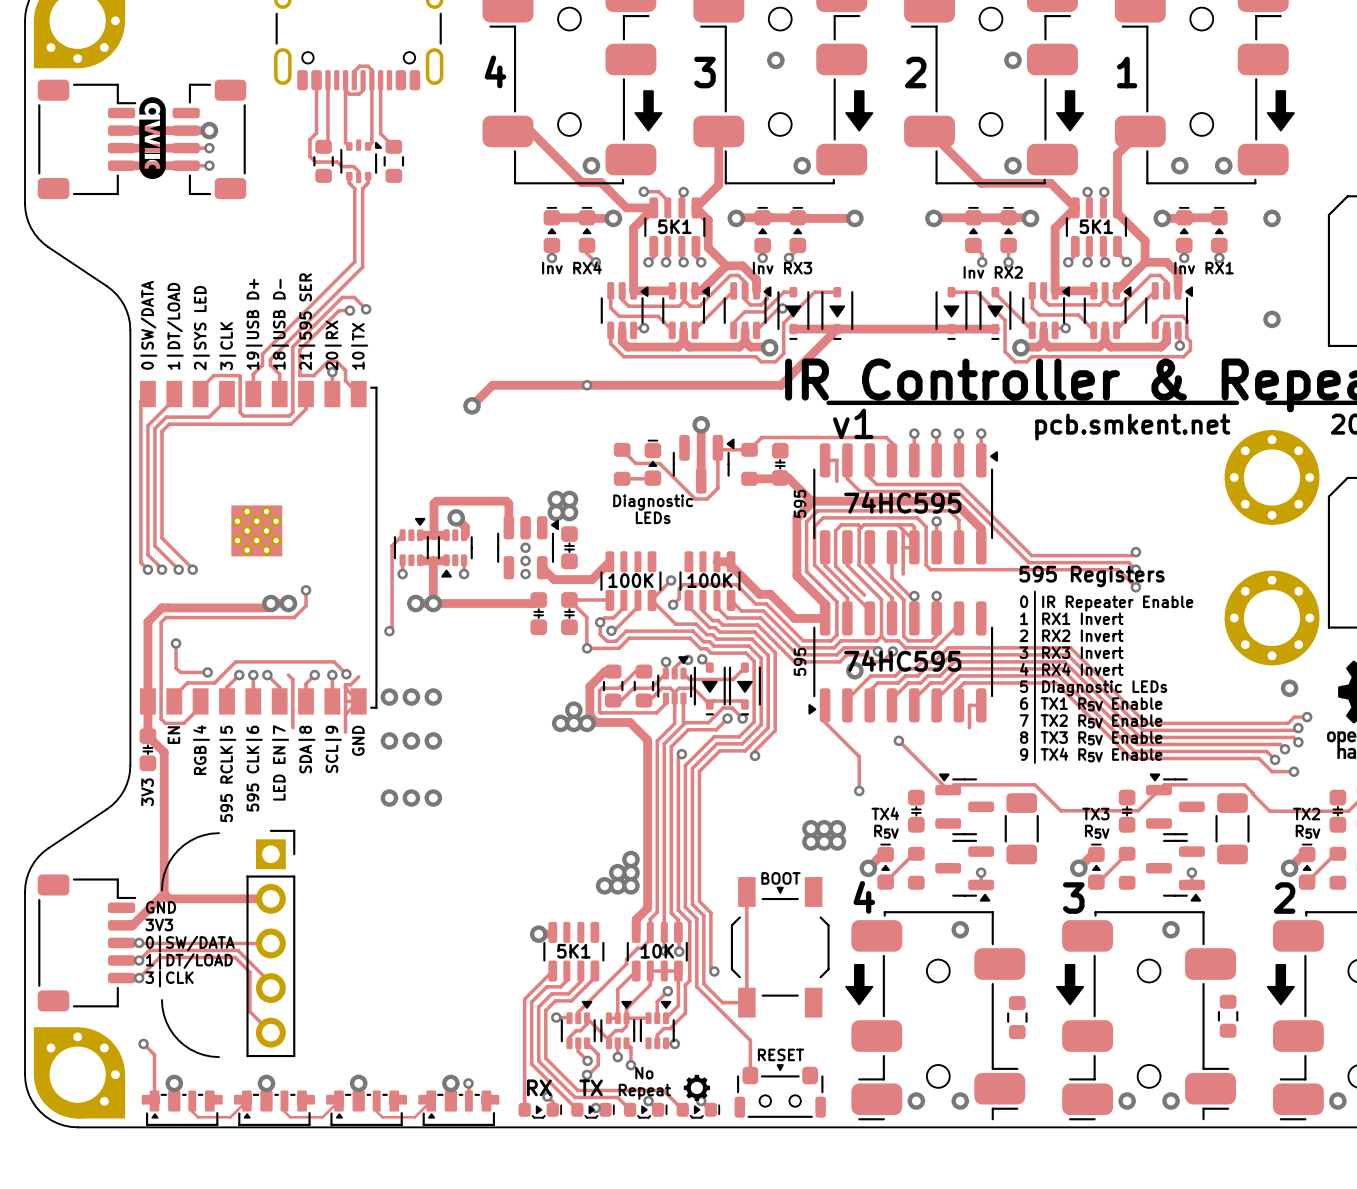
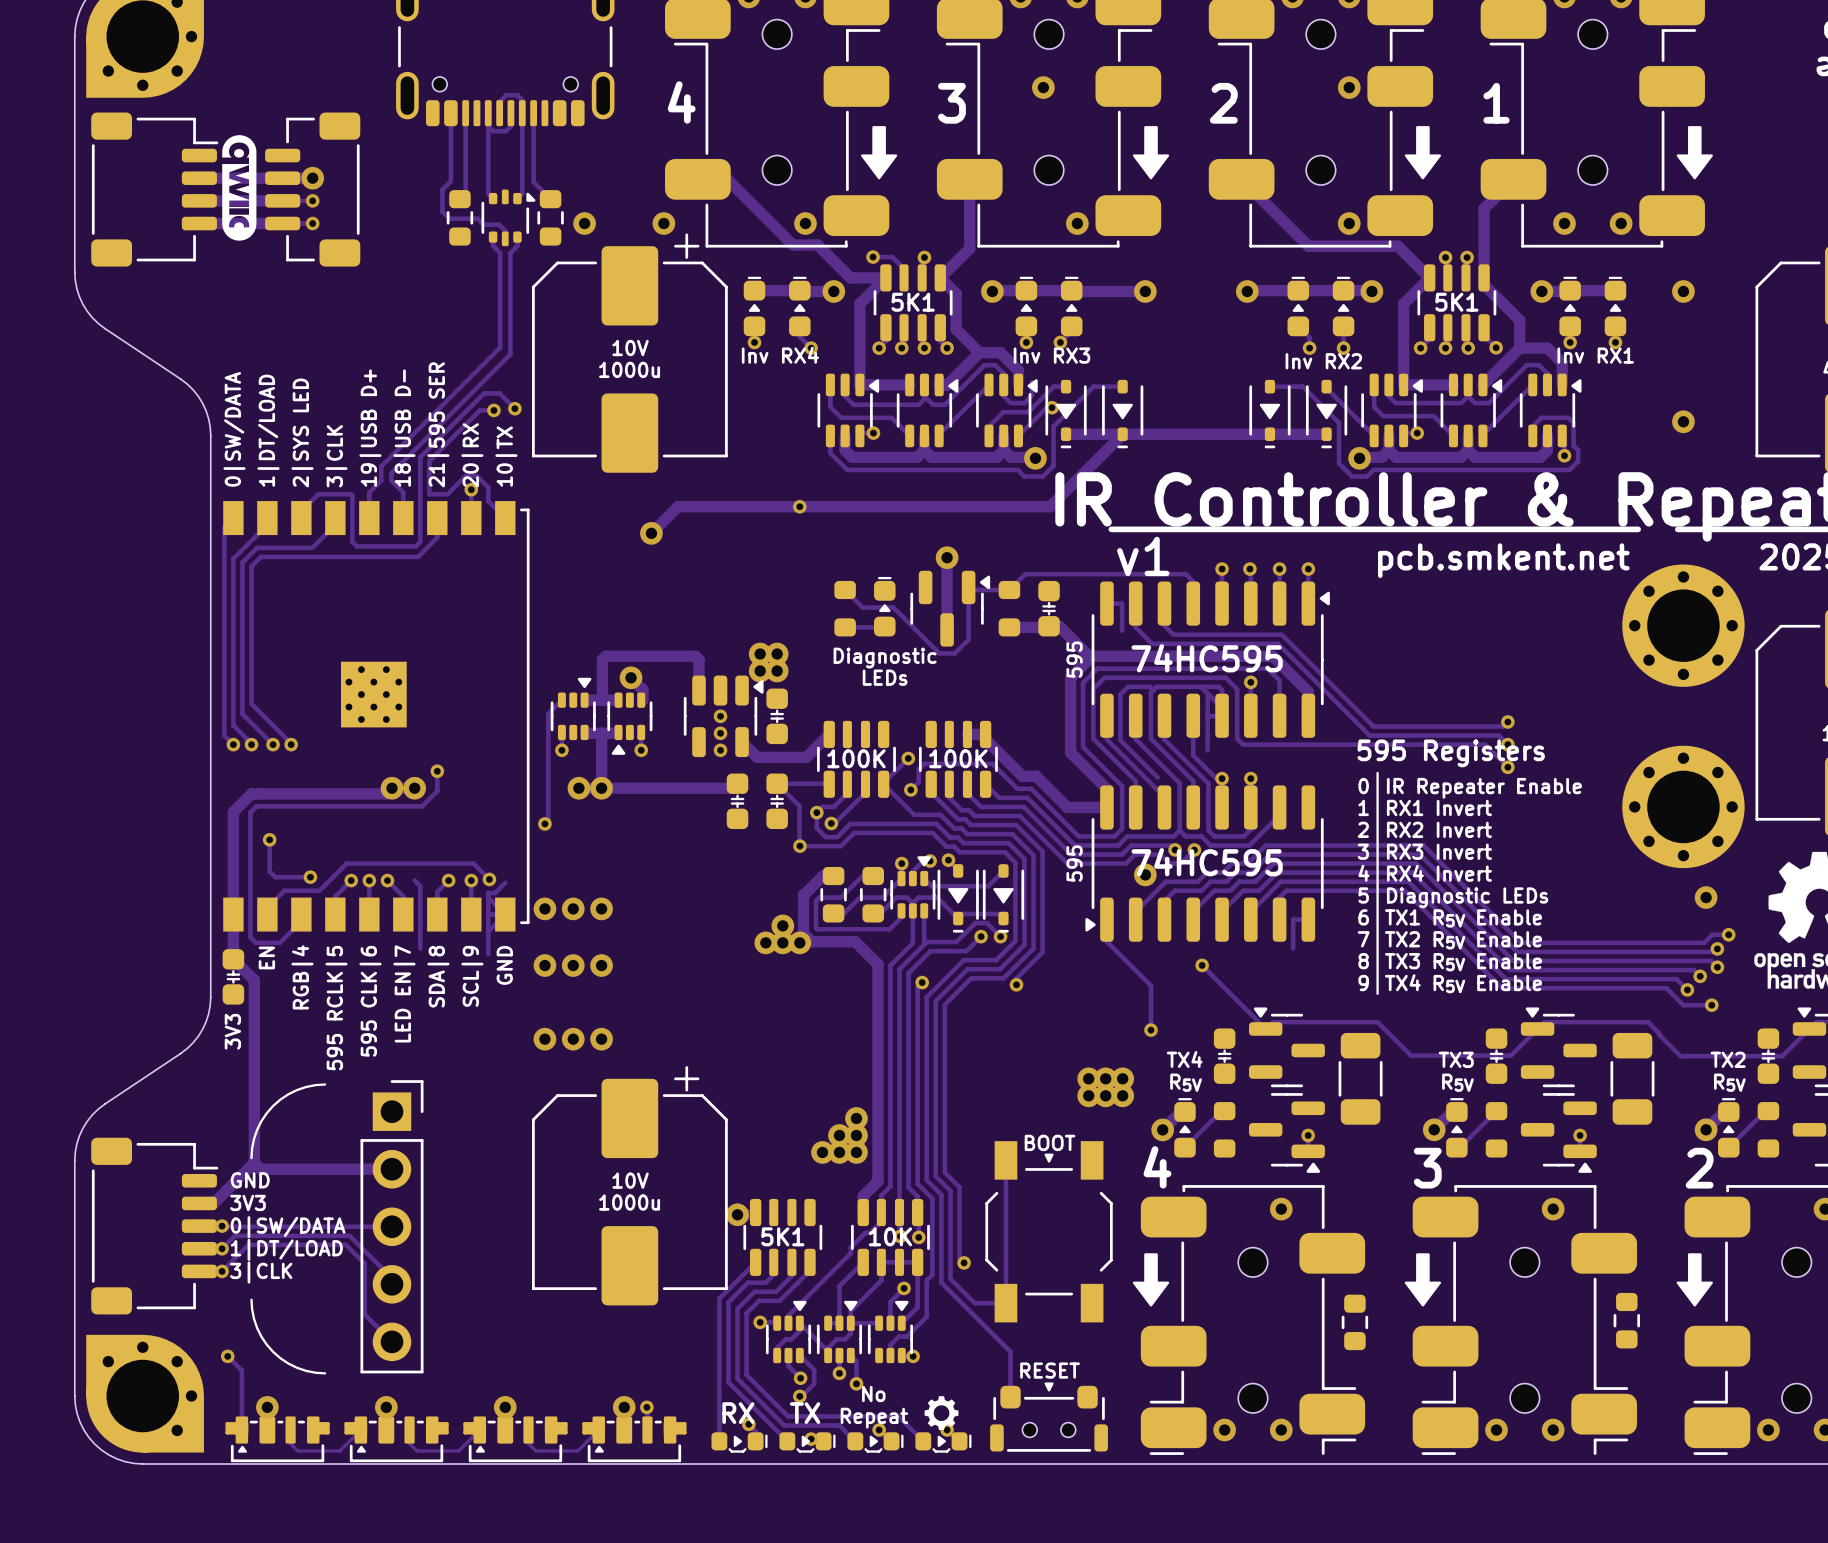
via: none -> (584, 223)
via: none -> (663, 223)
text: none -> 10V (630, 348)
part: none -> (629, 353)
text: none -> 1000u (629, 369)
text: none -> 10V (630, 1180)
part: none -> (629, 1185)
text: none -> 1000u (629, 1202)

